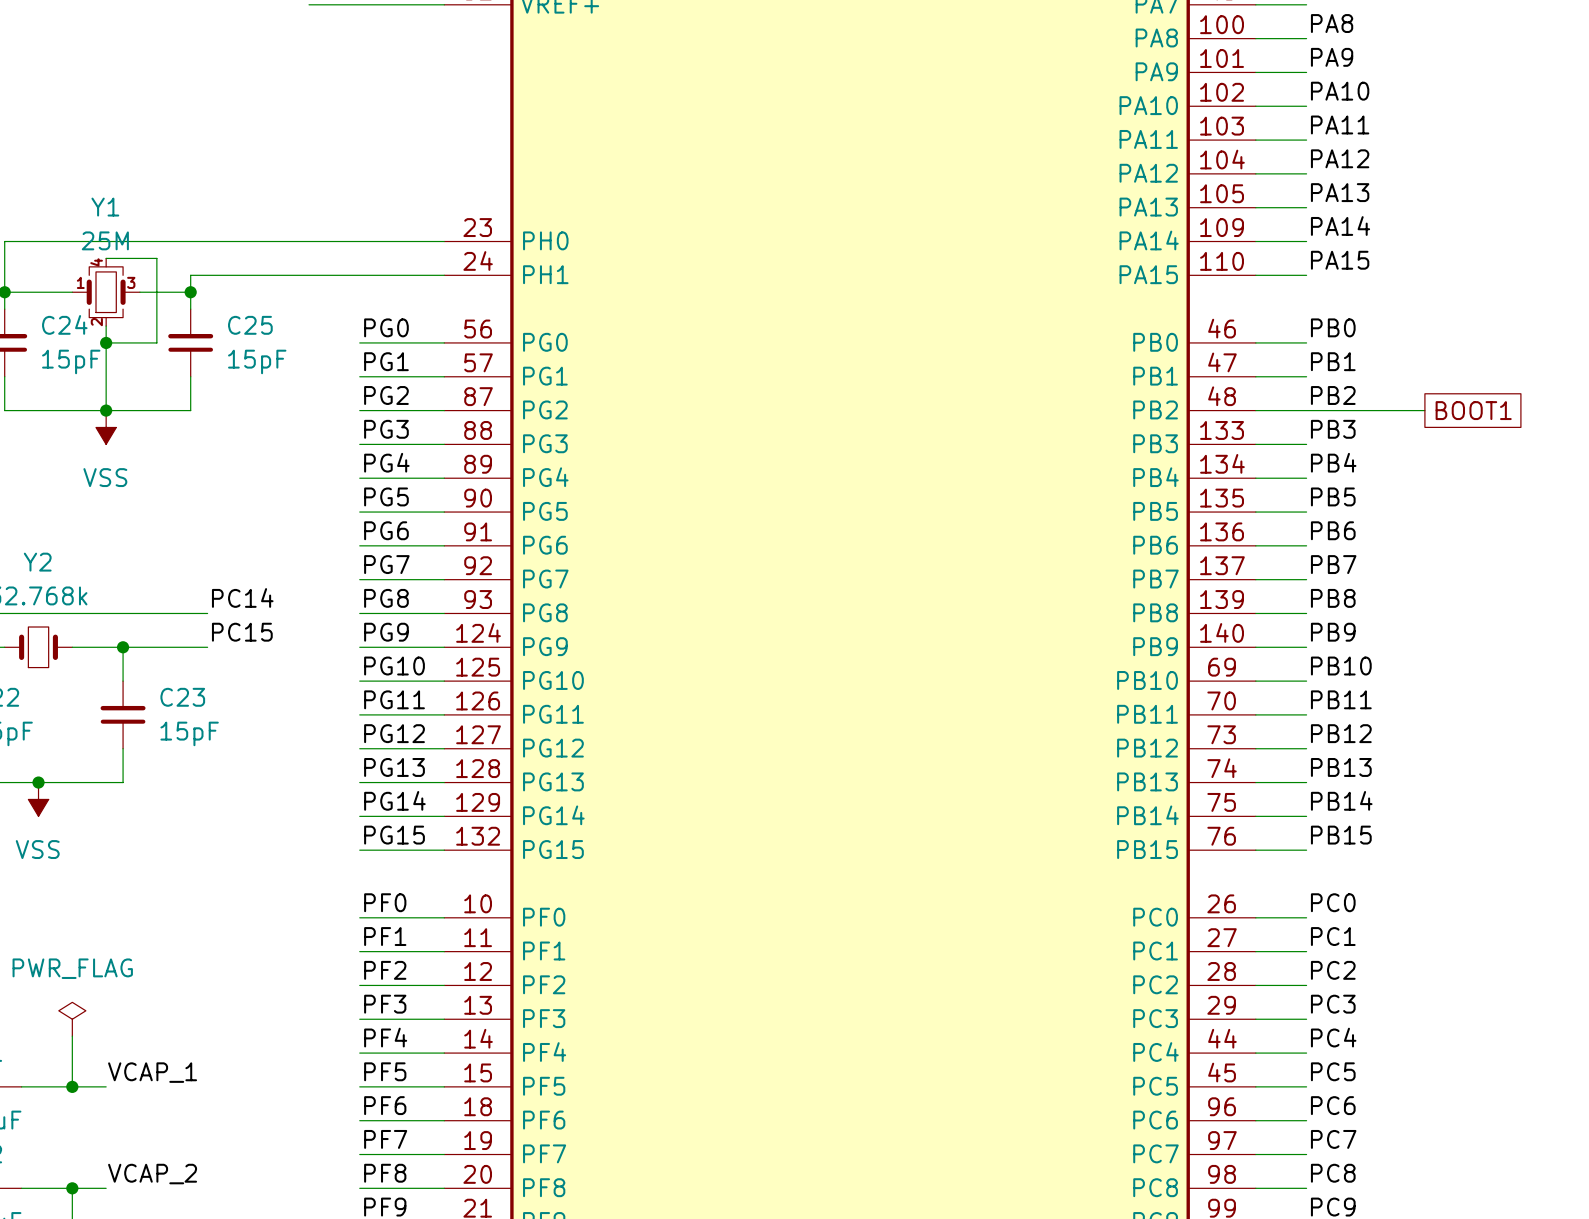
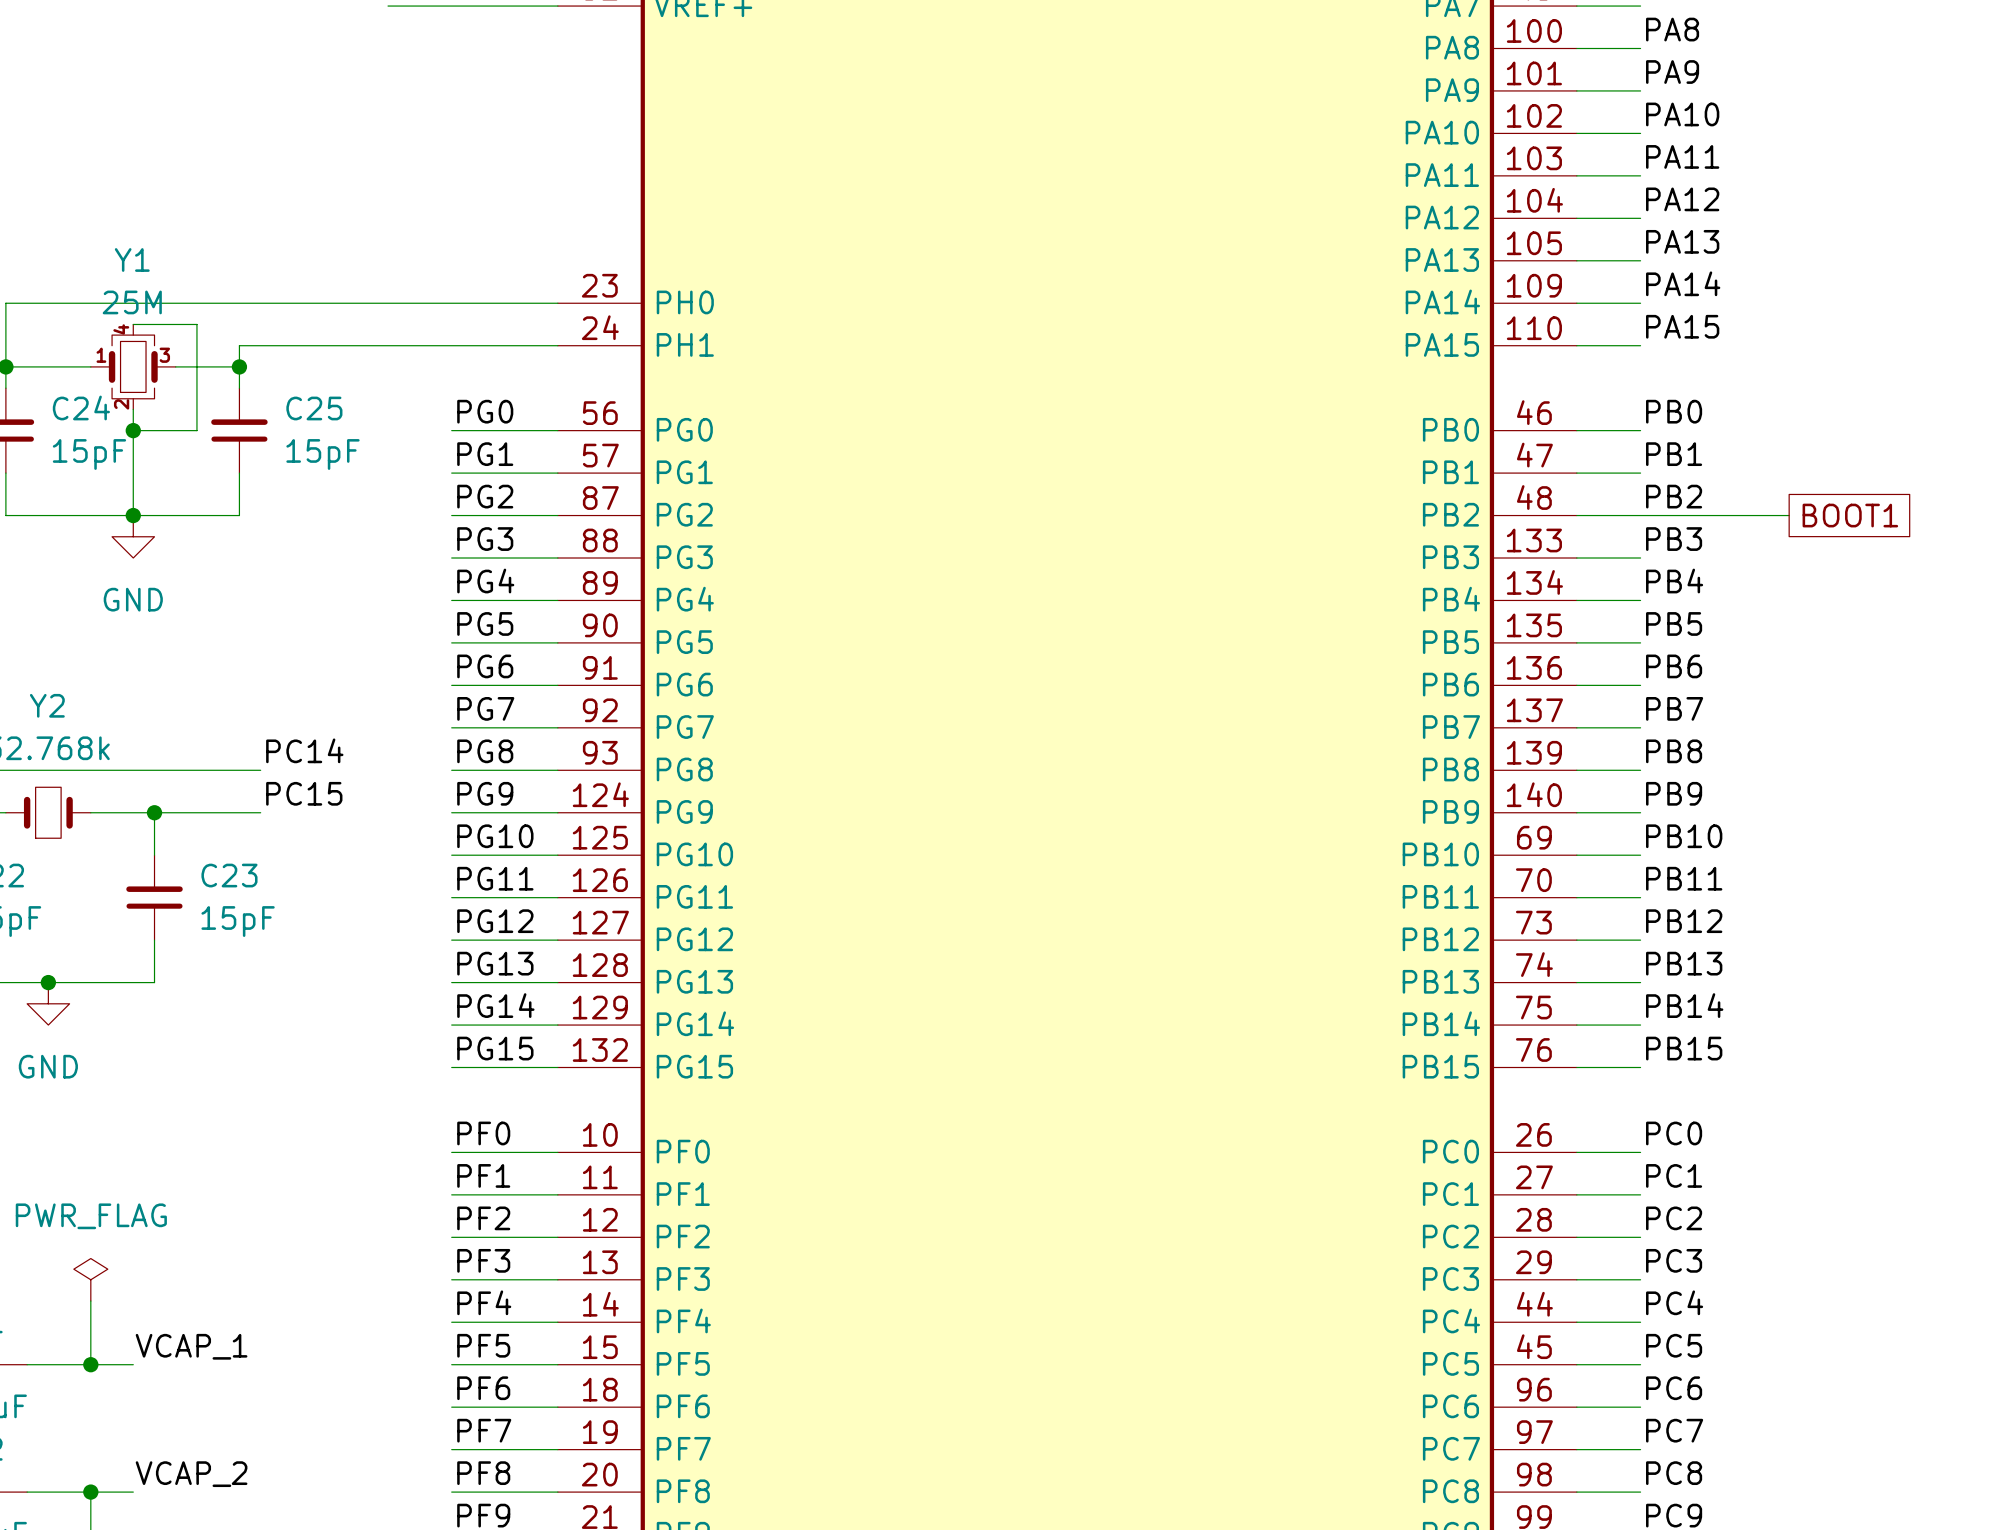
power symbol: VSS (106, 427) -> GND (133, 536)
power symbol: VSS (38, 799) -> GND (48, 1003)

